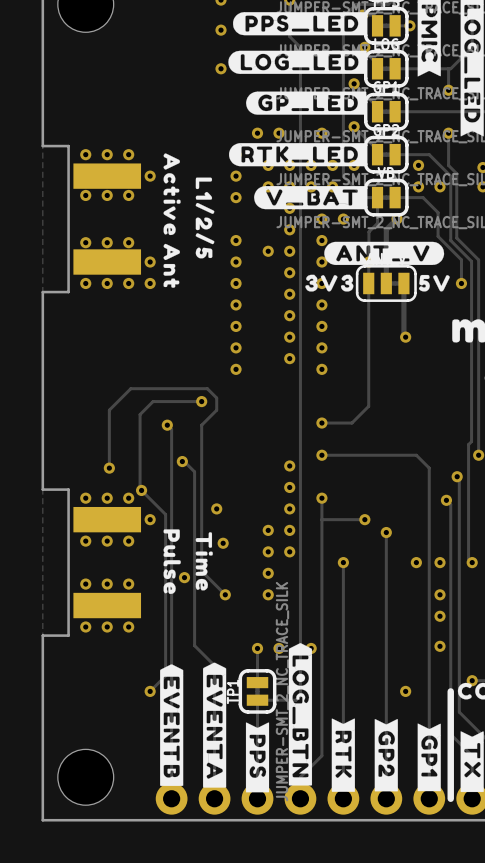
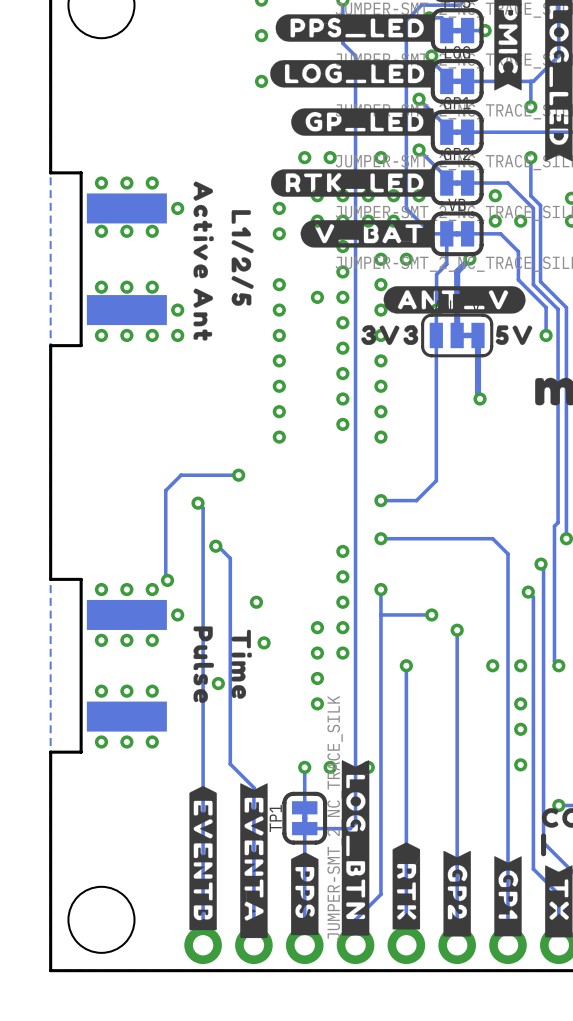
track: (109, 468) (109, 410) (130, 388) (207, 388) (216, 398) (216, 410) (201, 425) (201, 571) (225, 594) -> none
via: (109, 468) -> none
track: (141, 490) (165, 514) (165, 675) (150, 691) -> none
via: (225, 594) -> none
drawing shape: [288, 643, 313, 786] -> [341, 760, 370, 936]
drawing shape: [202, 662, 227, 788] -> [240, 783, 268, 939]
via: (150, 691) -> none
via: (405, 691) -> none
line: (450, 691) (450, 798) -> none
line: none -> (543, 836) (543, 853)
drawing shape: [331, 718, 355, 792] -> [392, 842, 421, 930]
drawing shape: [245, 722, 270, 793] -> [291, 852, 319, 936]

